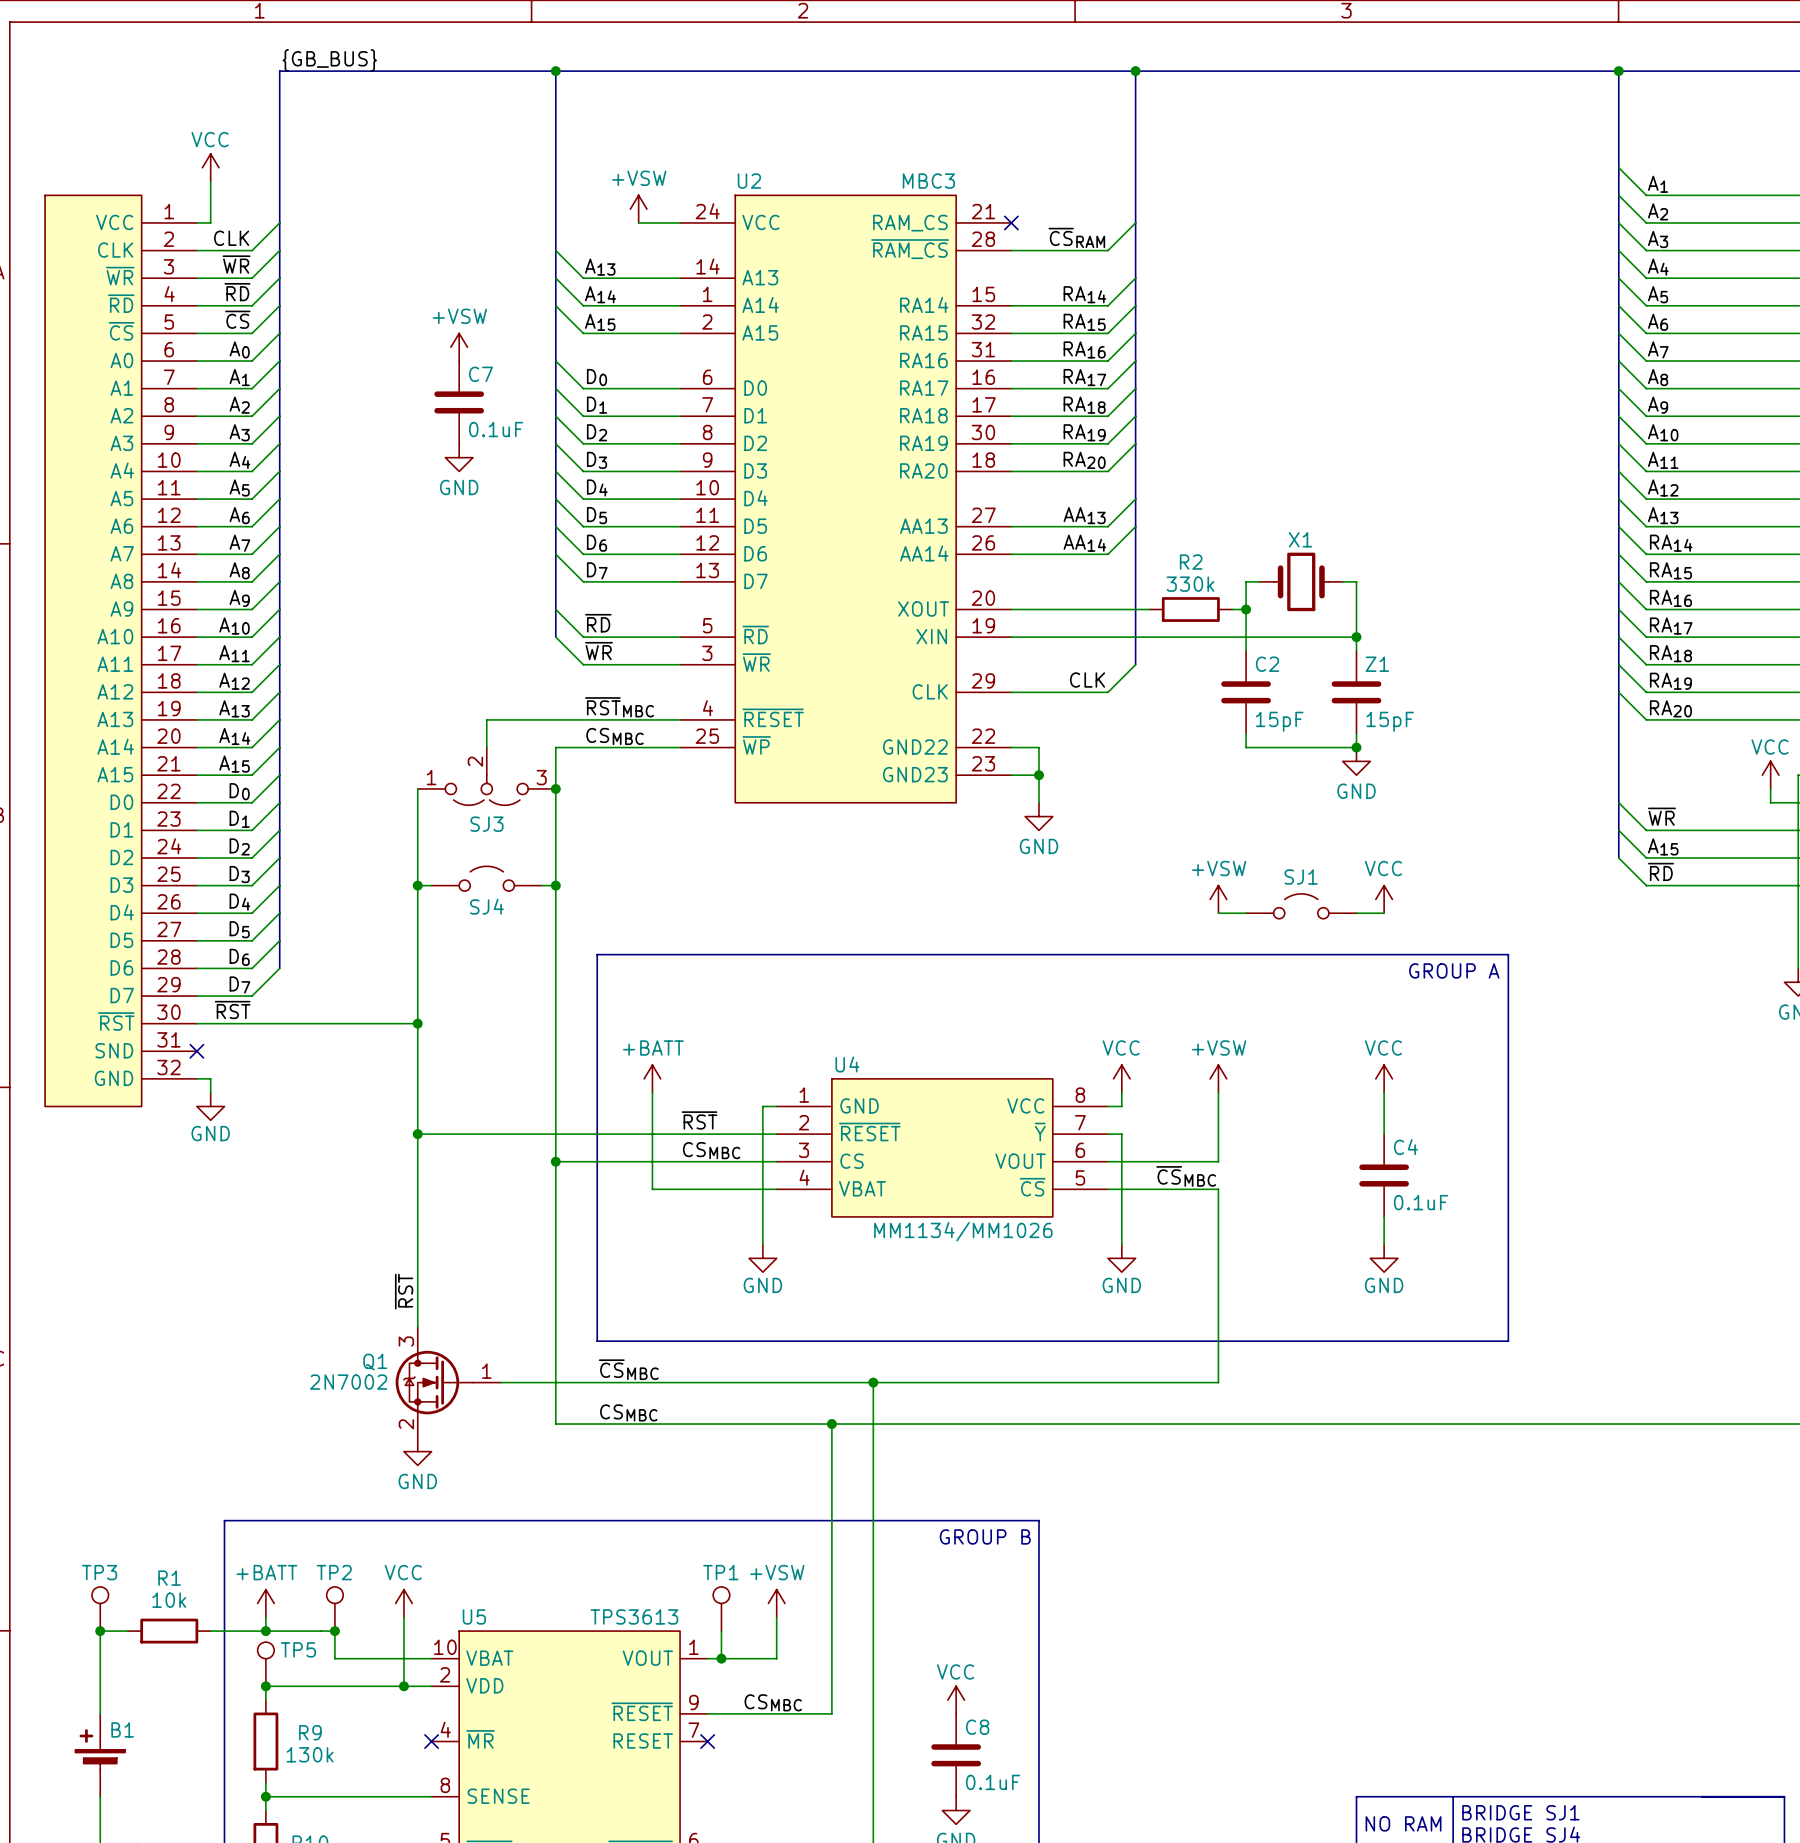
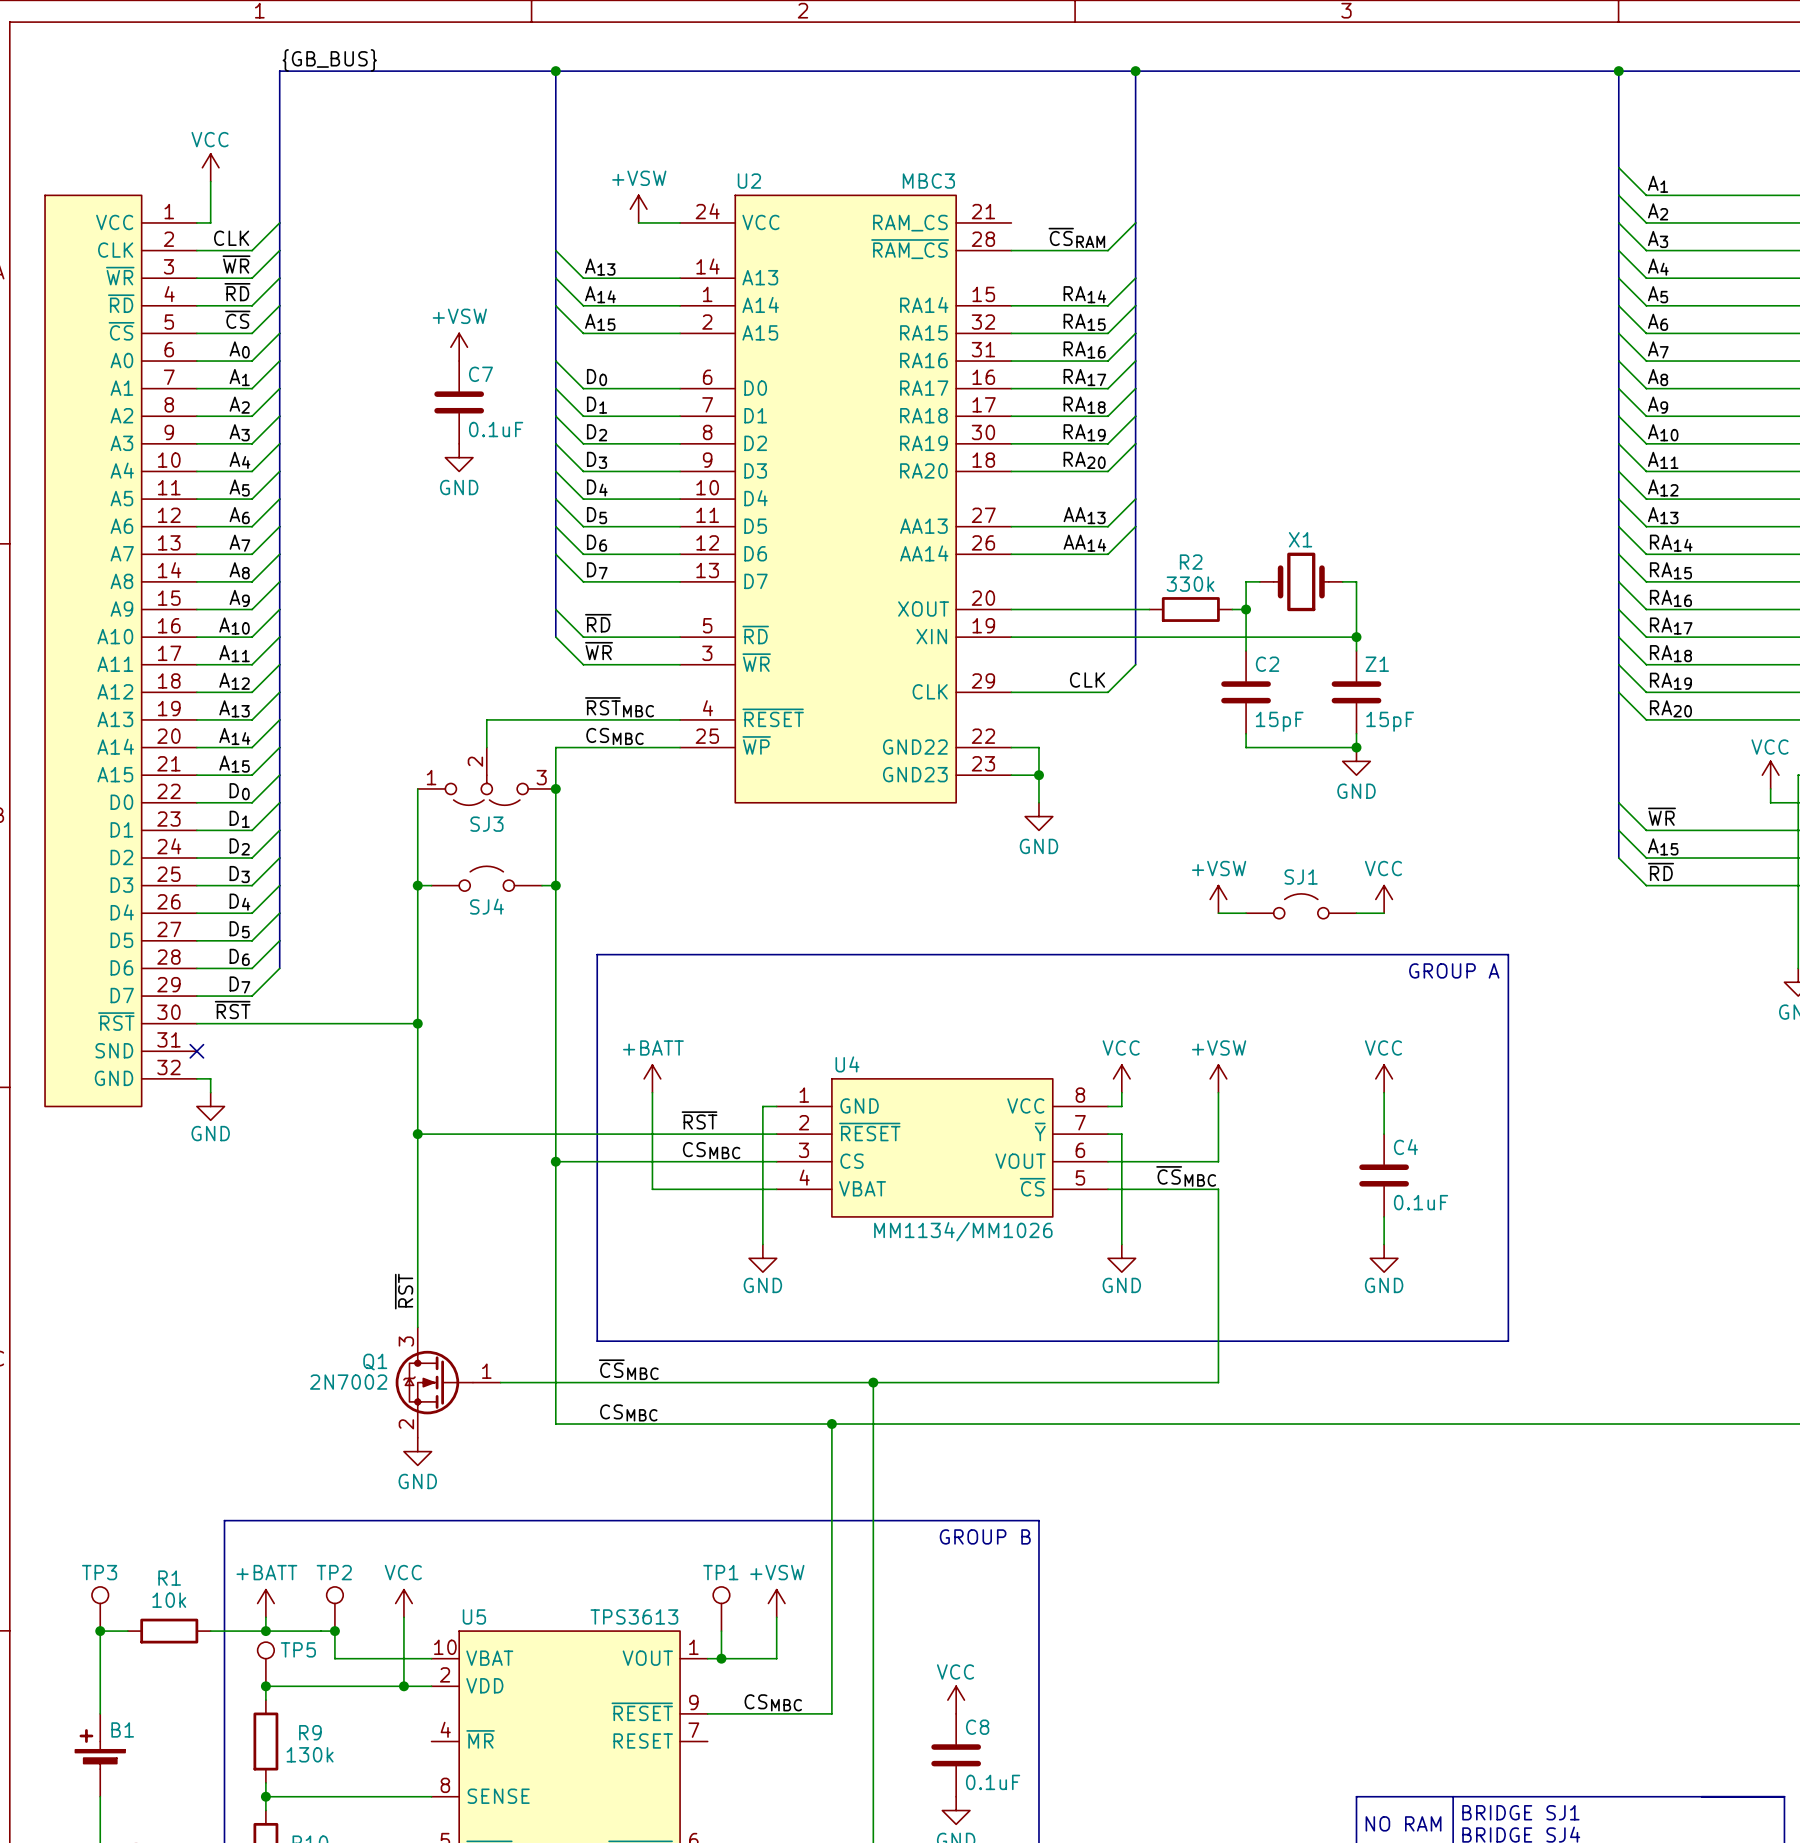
no-connect mark: (1011, 222) -> none
no-connect mark: (431, 1741) -> none
no-connect mark: (707, 1741) -> none

